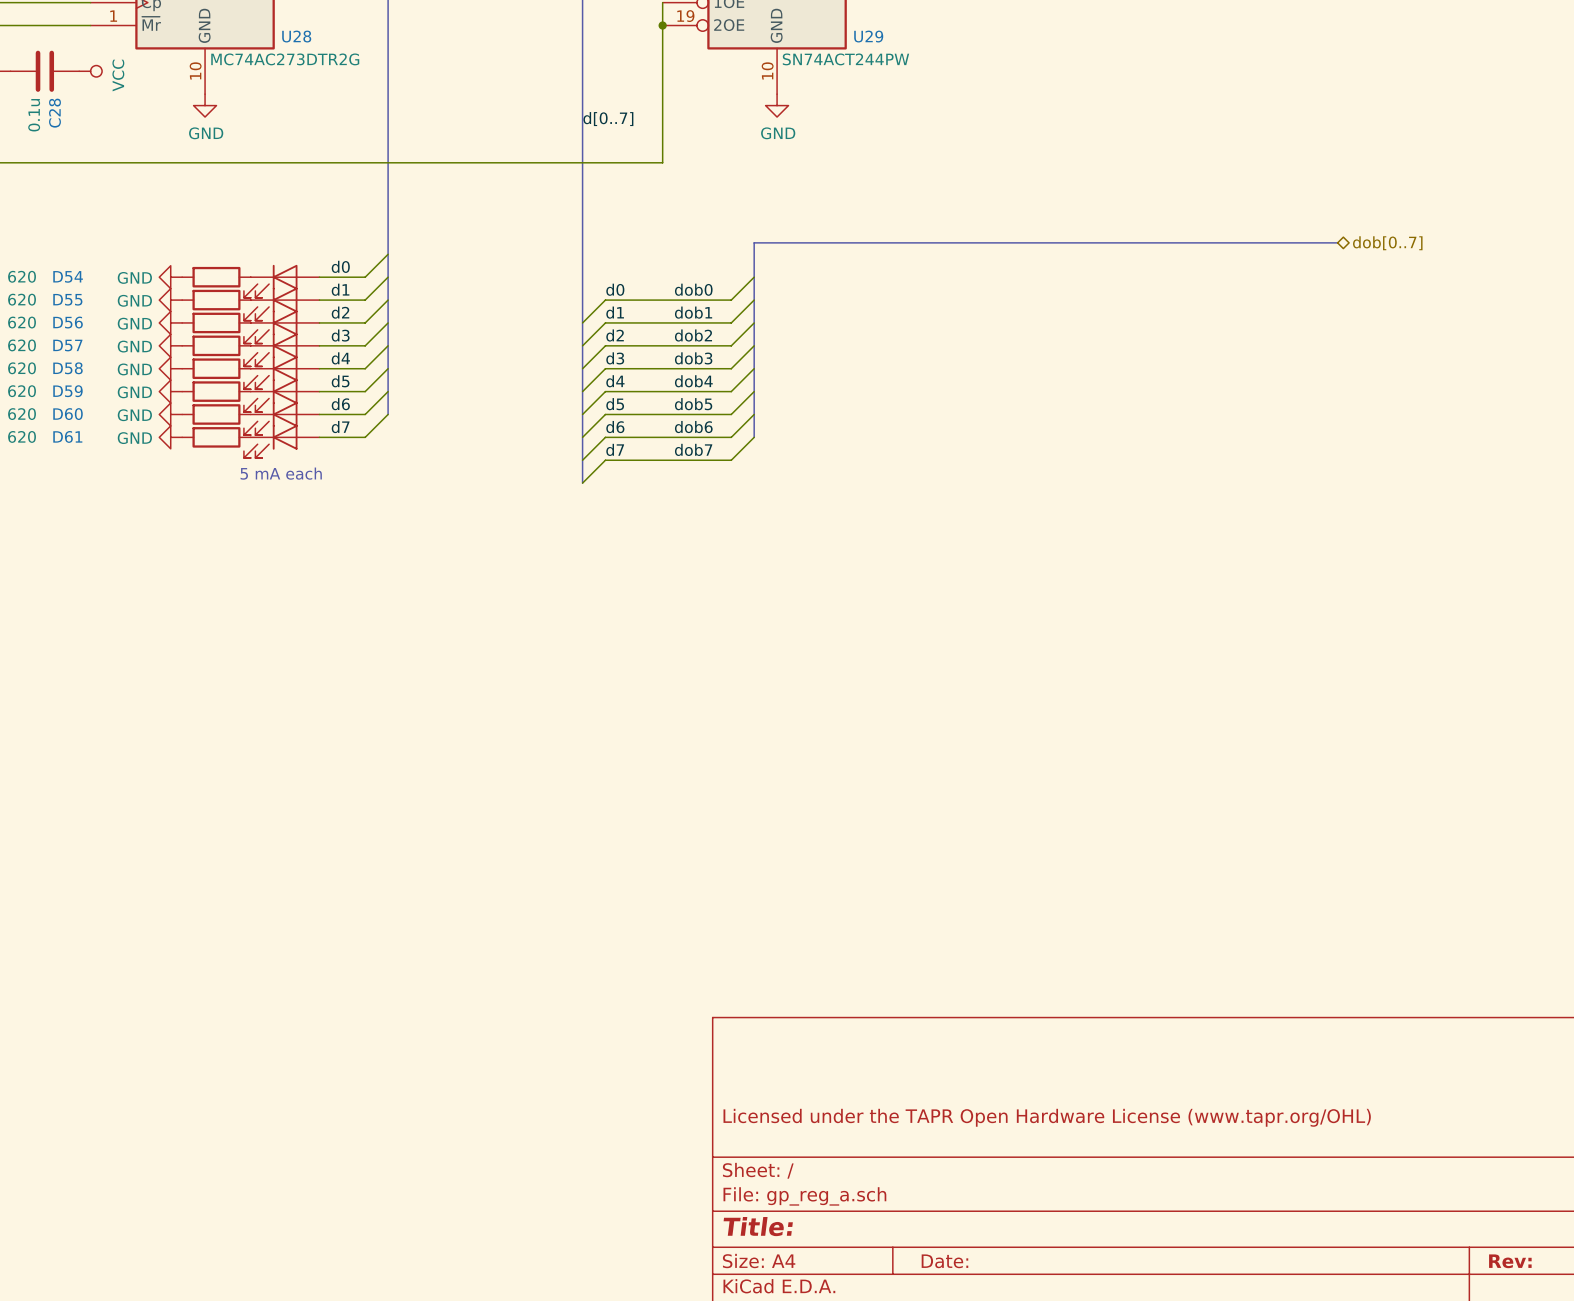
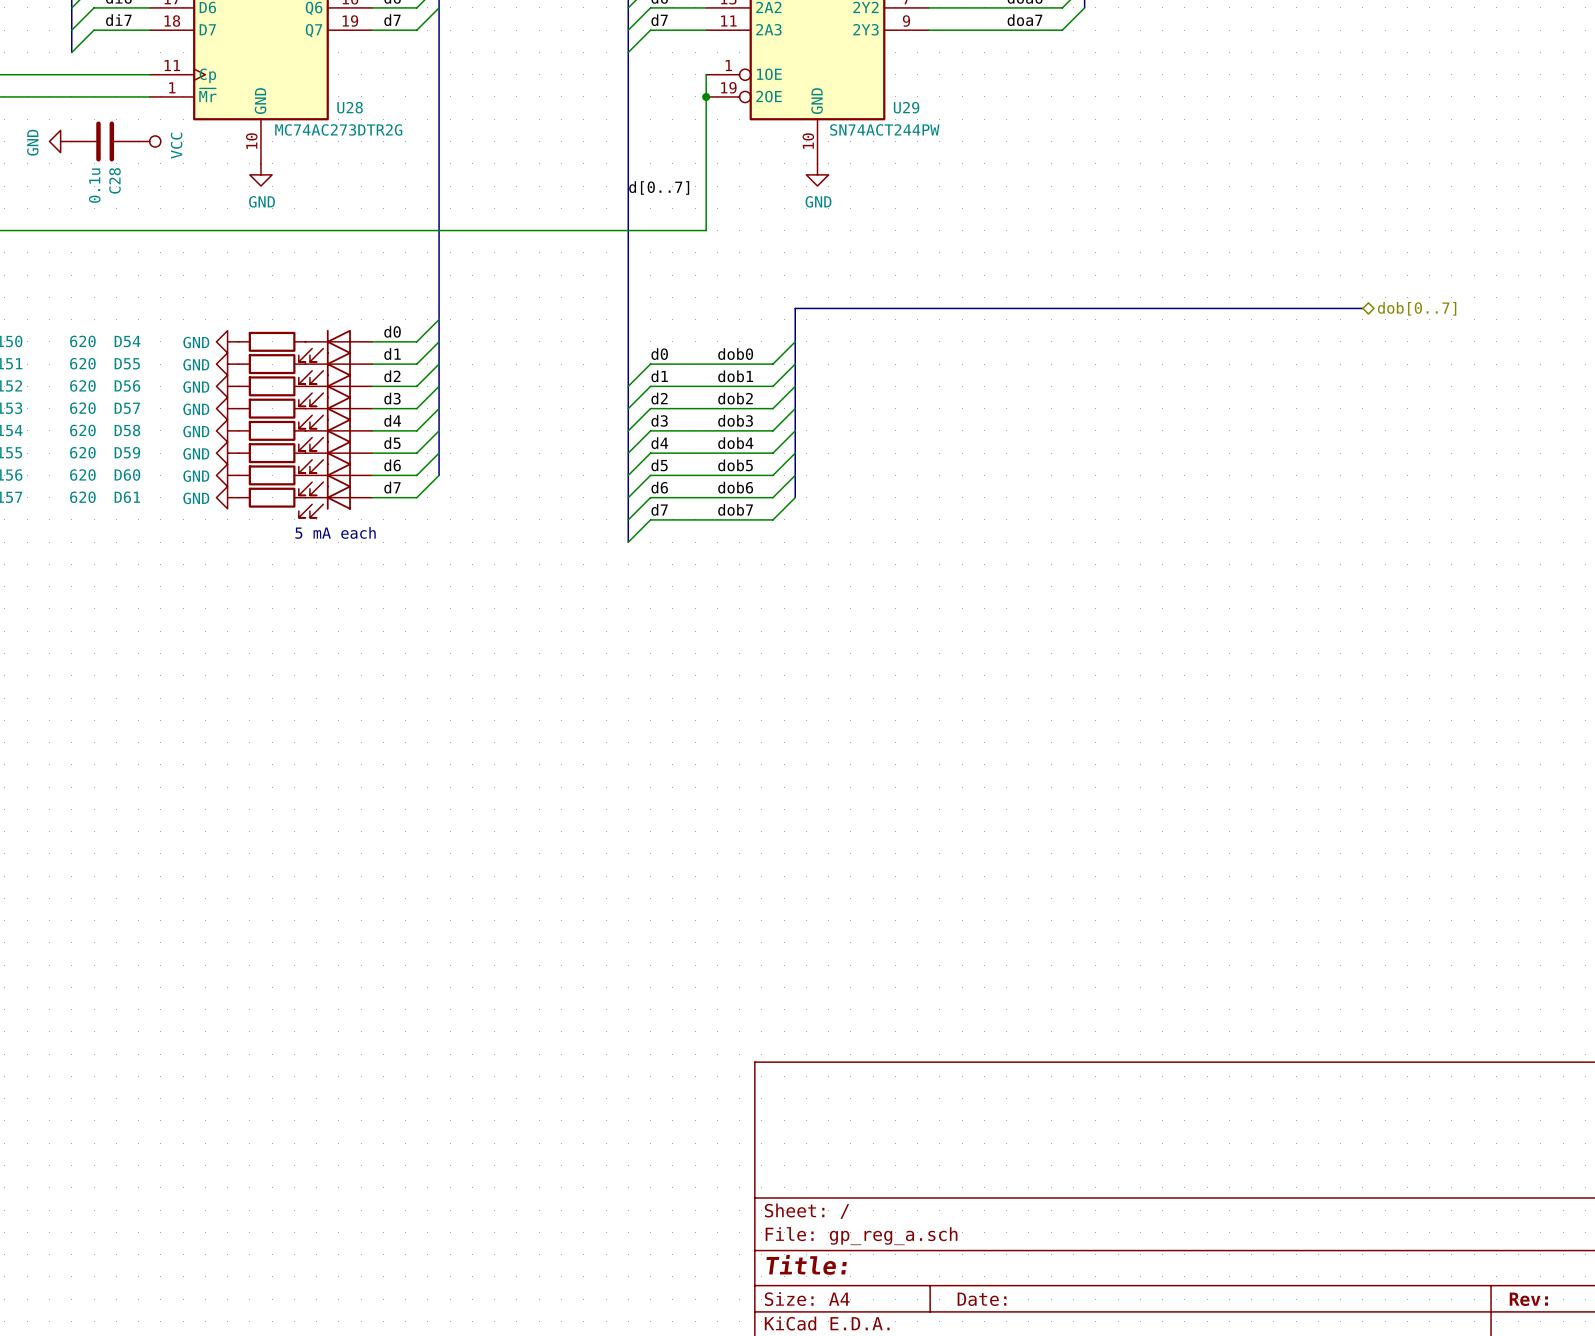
title block: Licensed under the TAPR Open Hardware License (www.tapr.org/OHL) (1047, 1117) -> none

